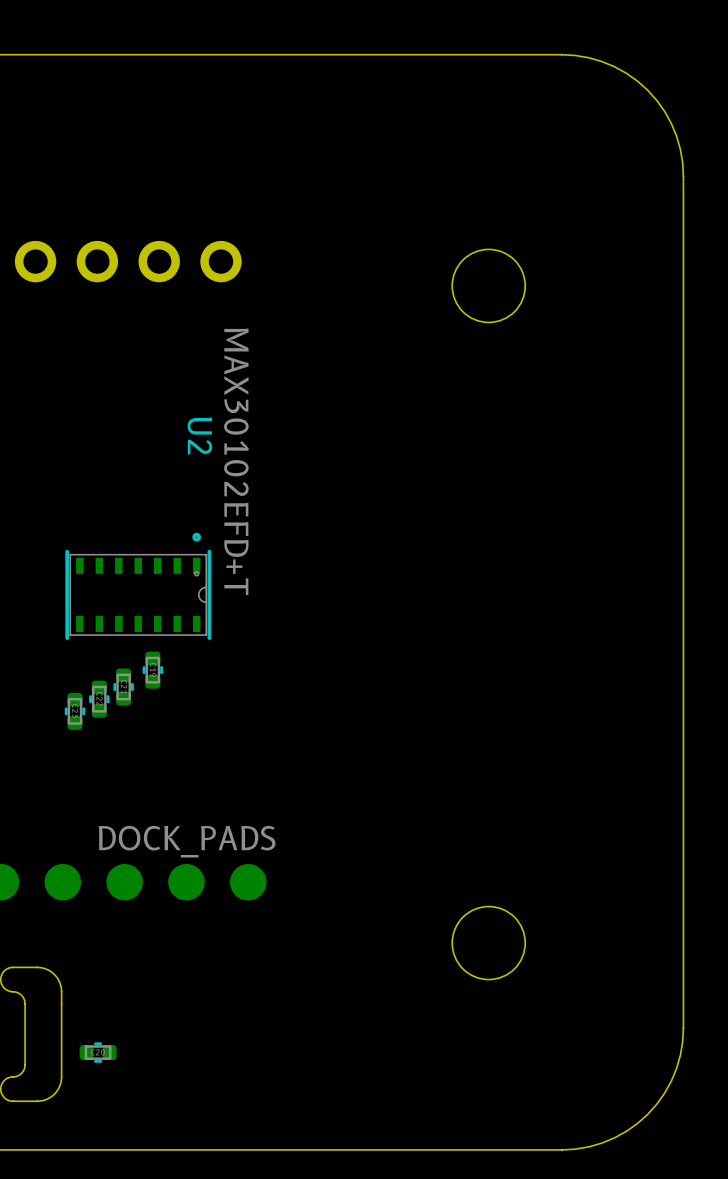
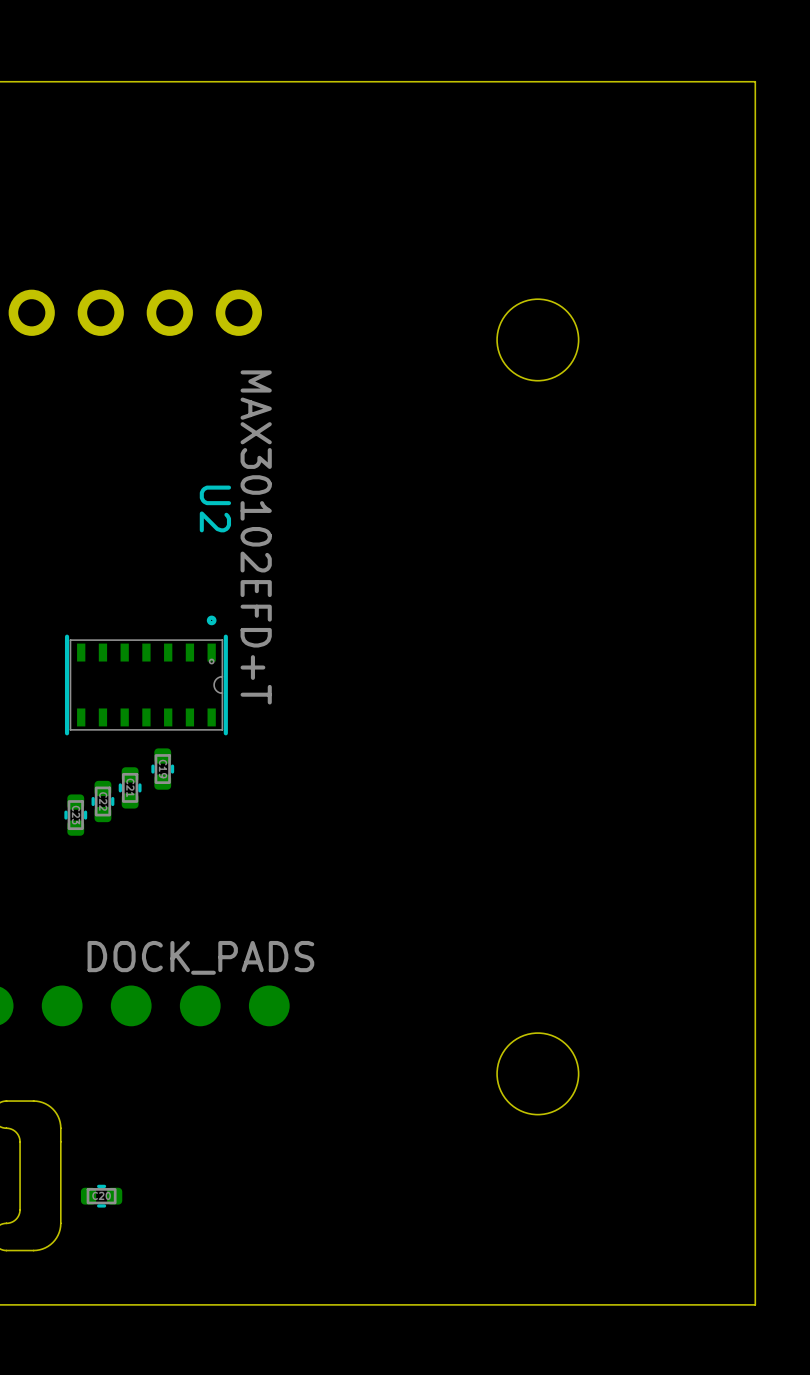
board edge: (561, 54) (588, 57) (614, 66) (626, 73) (647, 90) (664, 111) (676, 136) (680, 149) (683, 176) -> (619, 81) (755, 81) (755, 217)
board edge: (683, 1028) (680, 1055) (671, 1081) (664, 1092) (647, 1114) (637, 1123) (614, 1137) (588, 1146) (561, 1149) -> (755, 1168) (755, 1304) (619, 1304)

